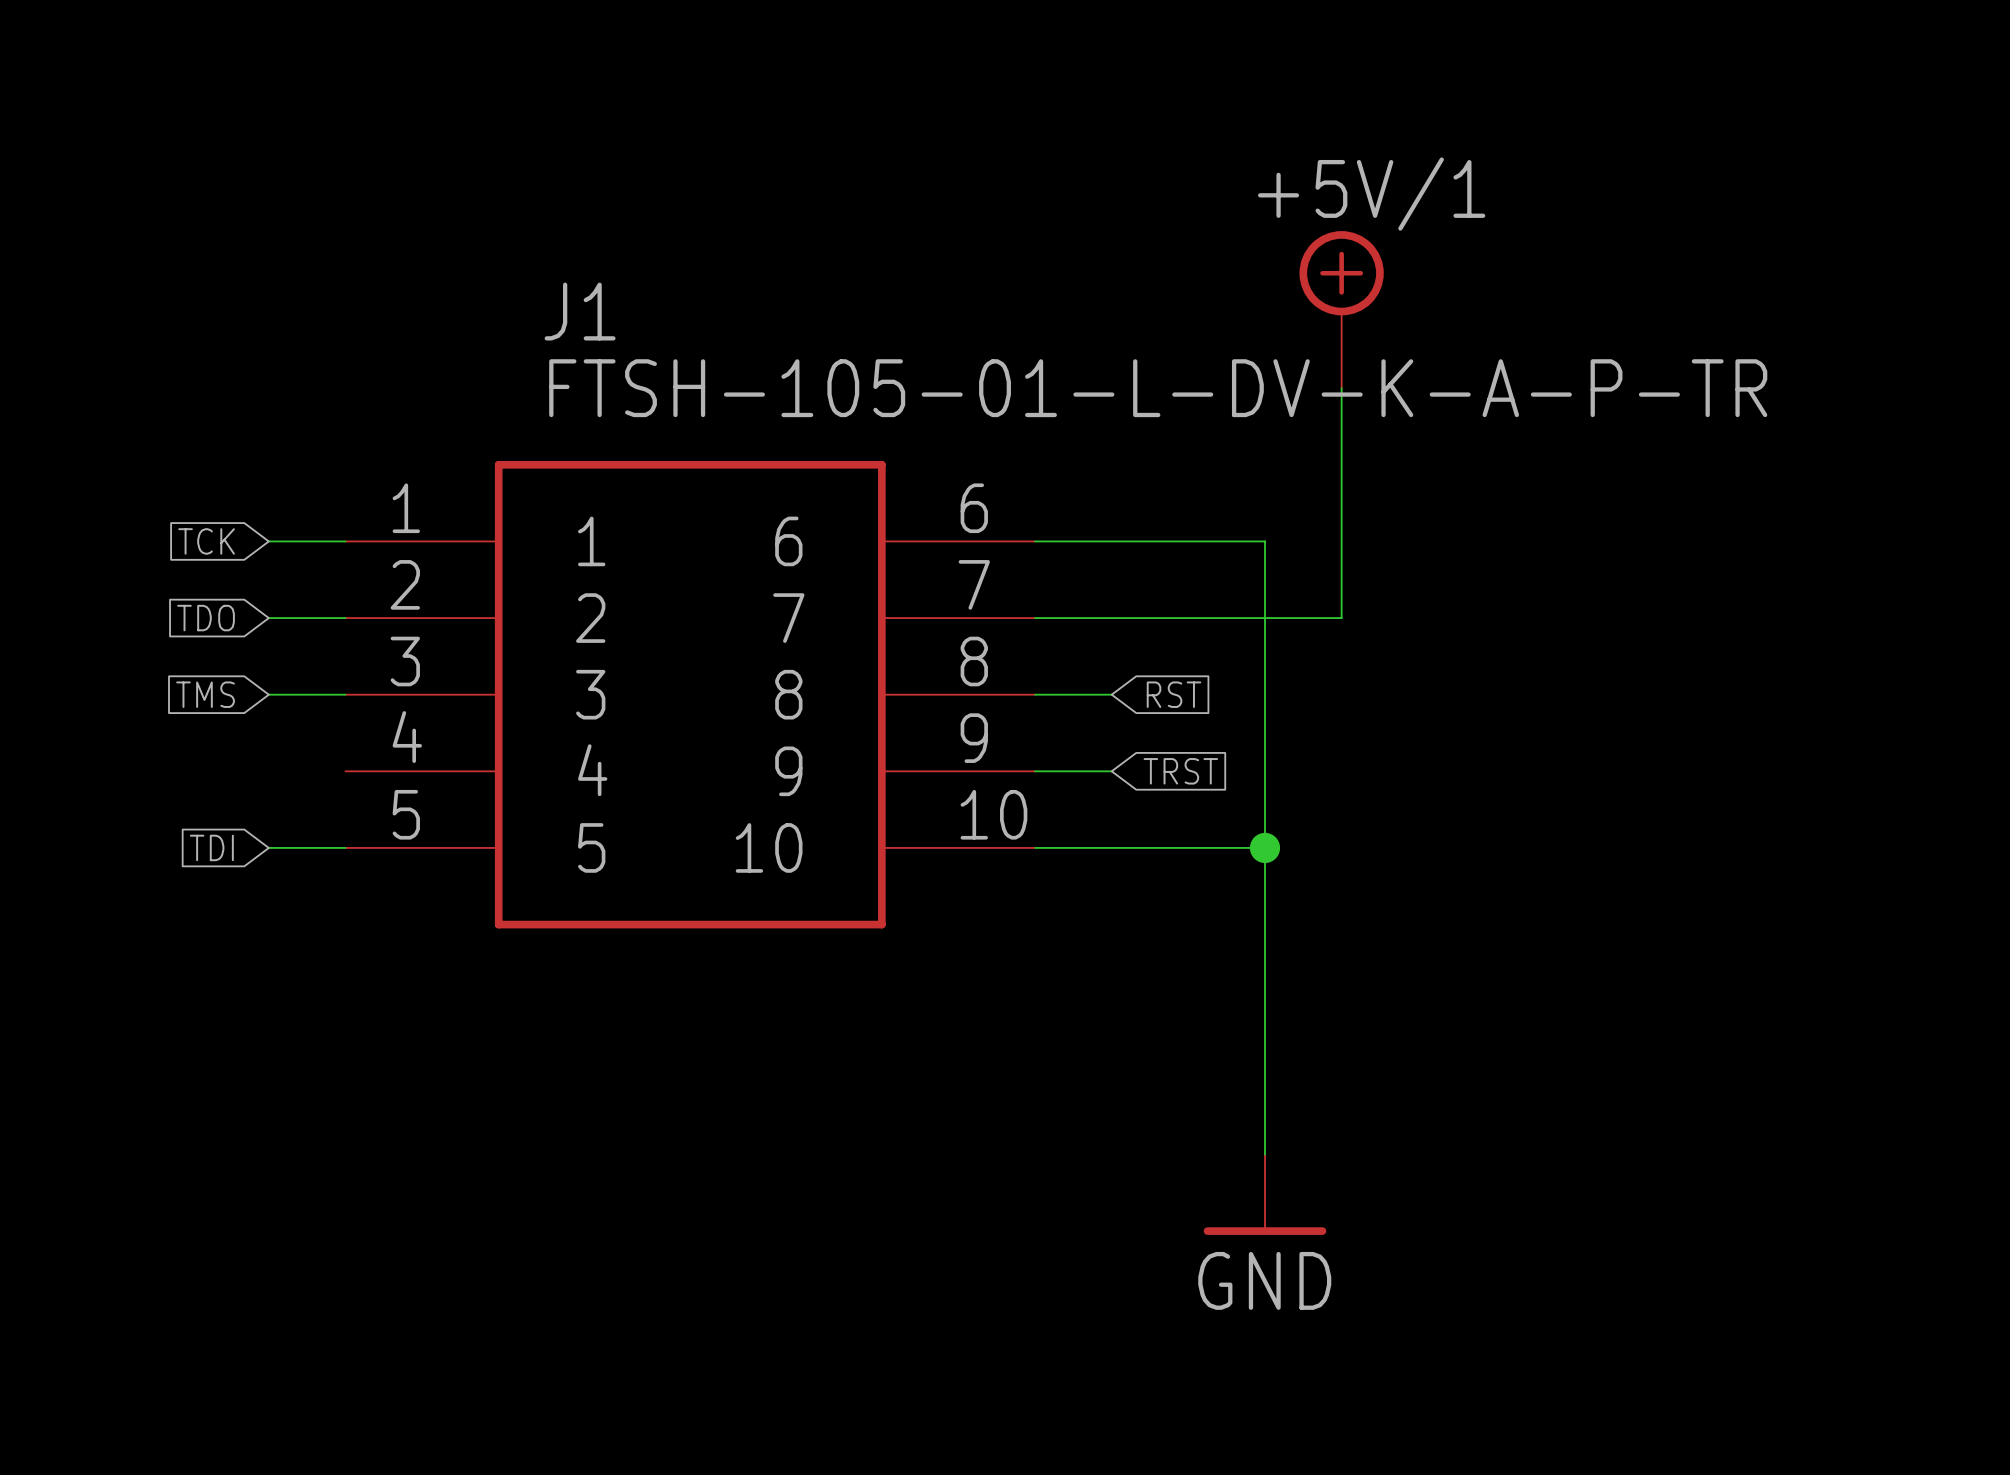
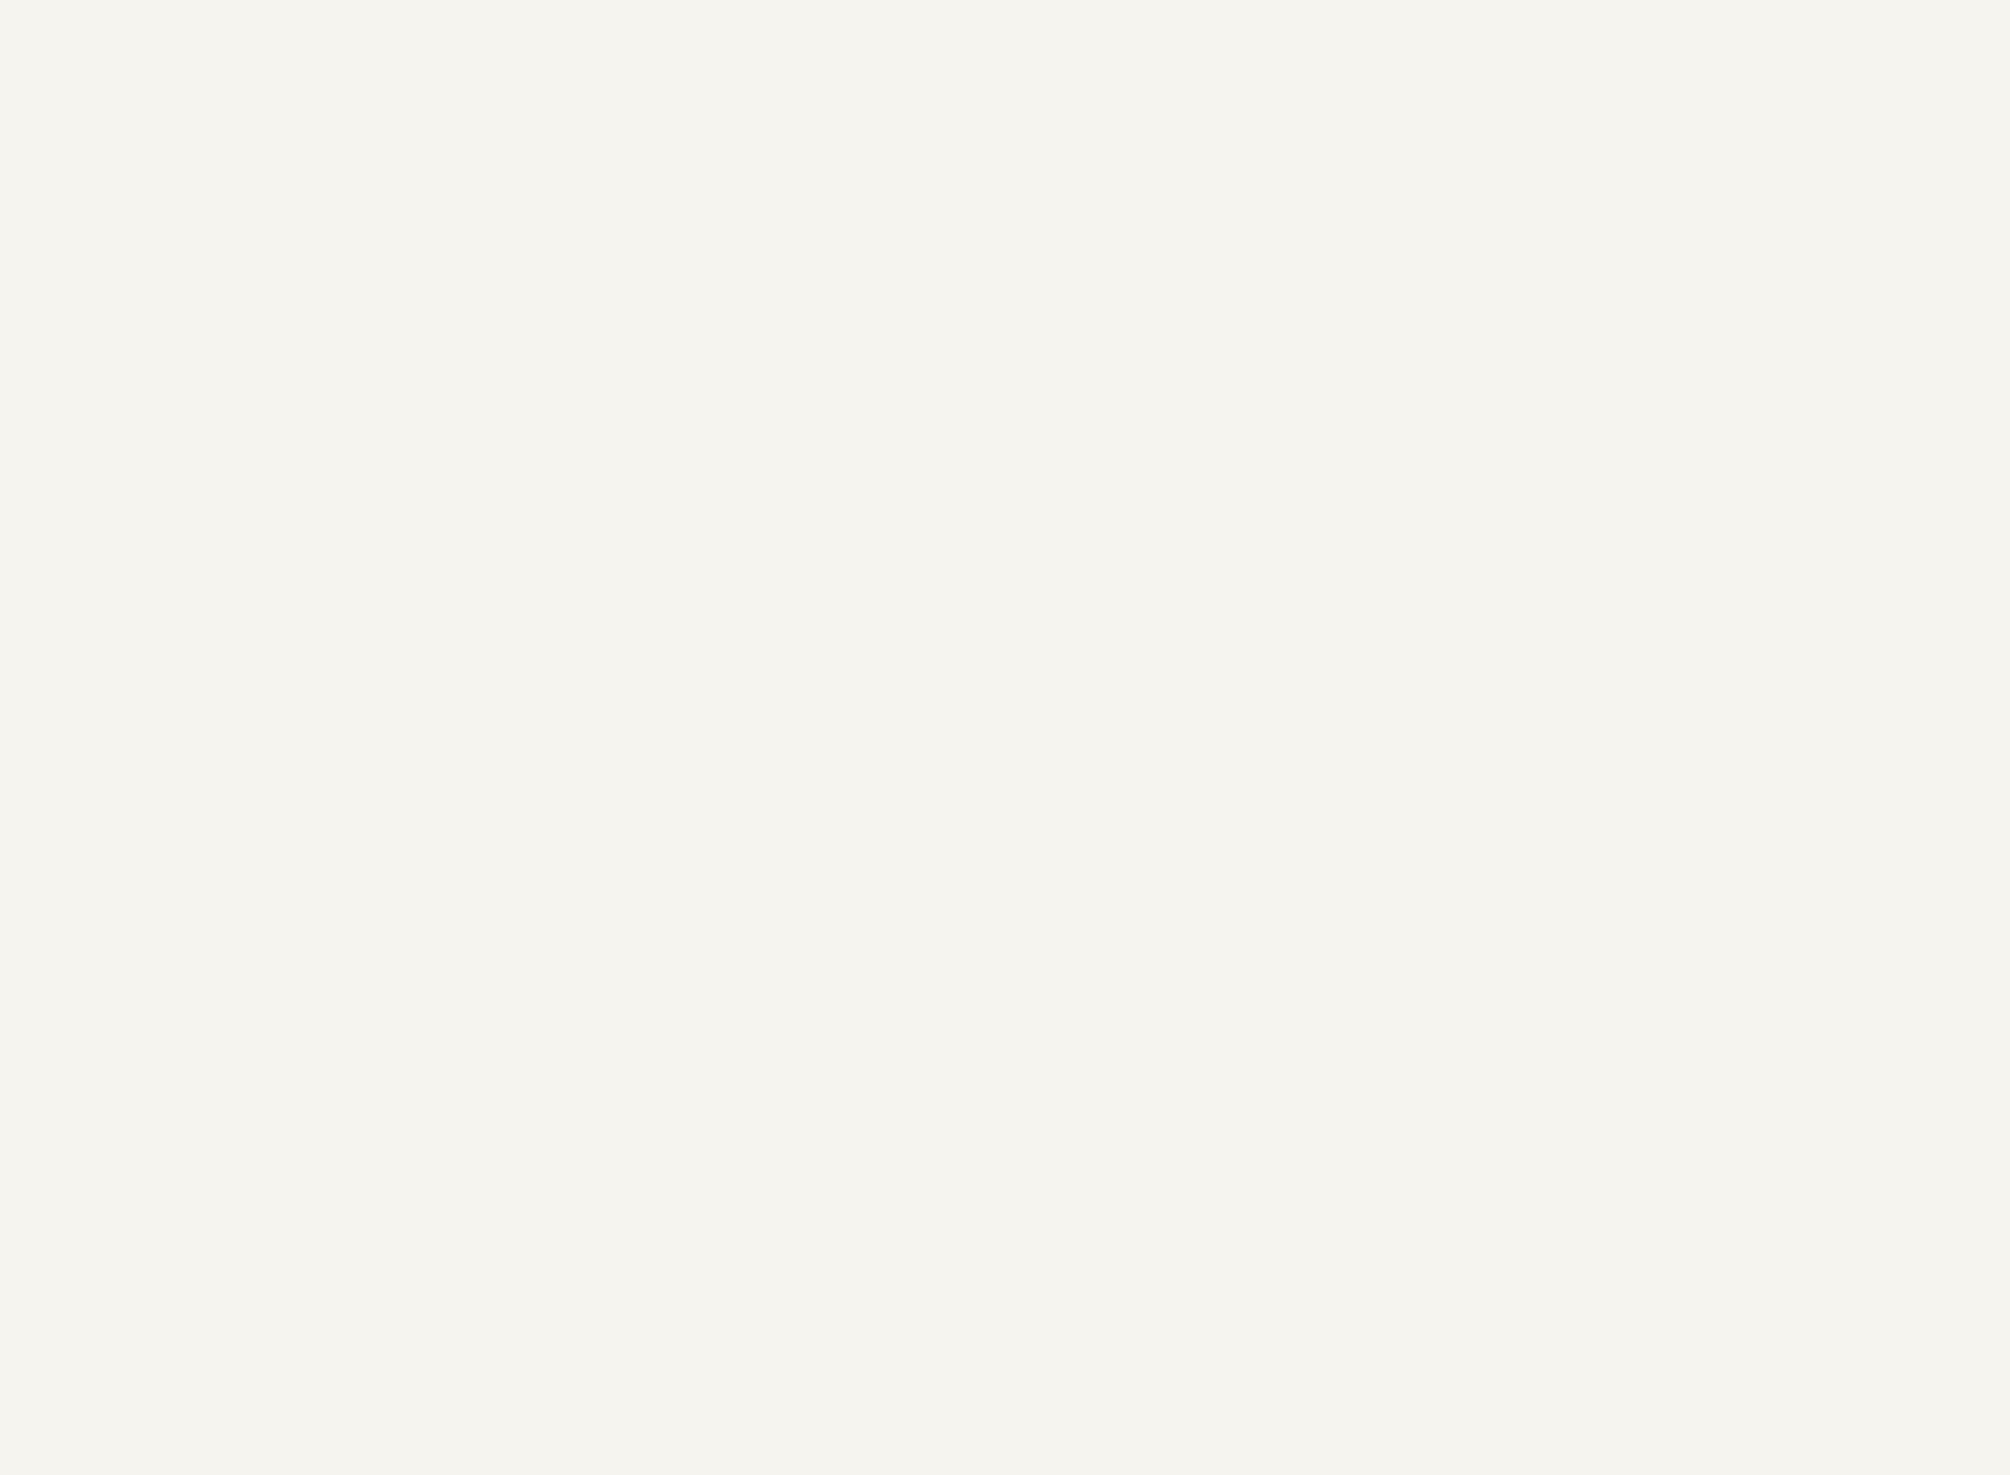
power symbol: +5V/1 (1341, 309) -> none
wire: (1341, 388) (1341, 618) (1035, 618) -> none
global label: TCK (206, 541) -> none
wire: (268, 541) (345, 541) -> none
wire: (1035, 541) (1265, 541) (1265, 1154) -> none
global label: TDO (206, 618) -> none
wire: (268, 618) (345, 618) -> none
global label: TMS (205, 694) -> none
wire: (268, 694) (345, 694) -> none
J1: FTSH-105-01-L-DV-K-A-P-TR (690, 694) -> none
wire: (1035, 694) (1111, 694) -> none
global label: RST (1173, 694) -> none
wire: (1035, 771) (1111, 771) -> none
global label: TRST (1180, 771) -> none
global label: TDI (211, 847) -> none
wire: (268, 847) (345, 847) -> none
wire: (1035, 847) (1265, 847) -> none
junction: (1265, 847) -> none
power symbol: GND (1265, 1194) -> none

